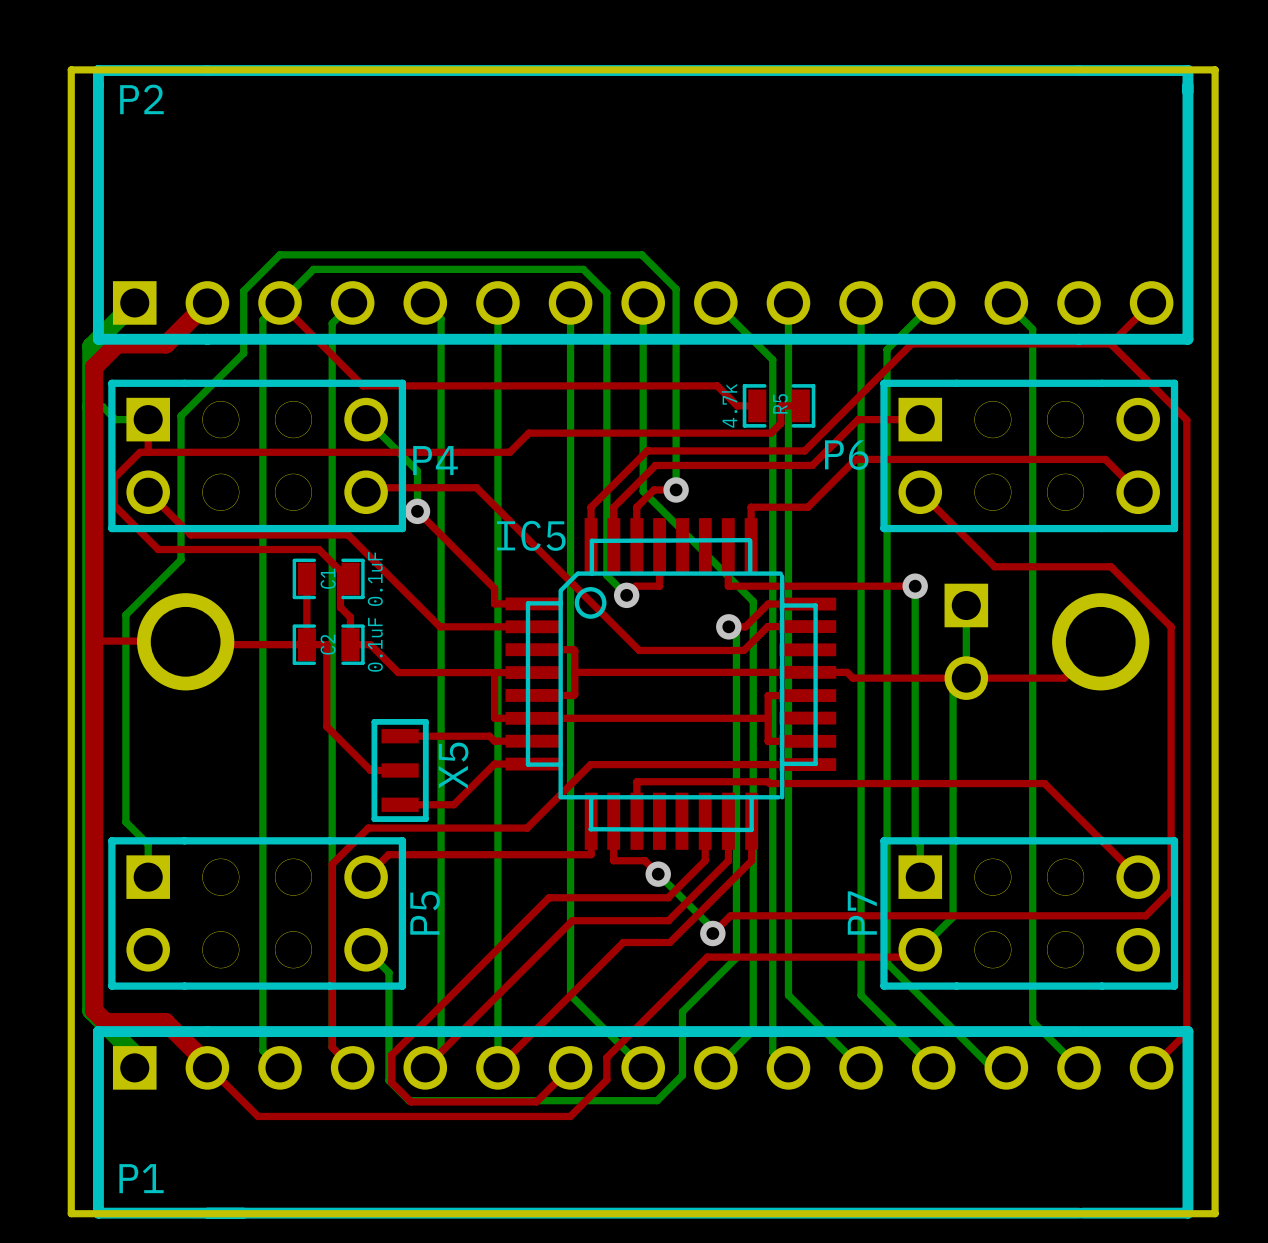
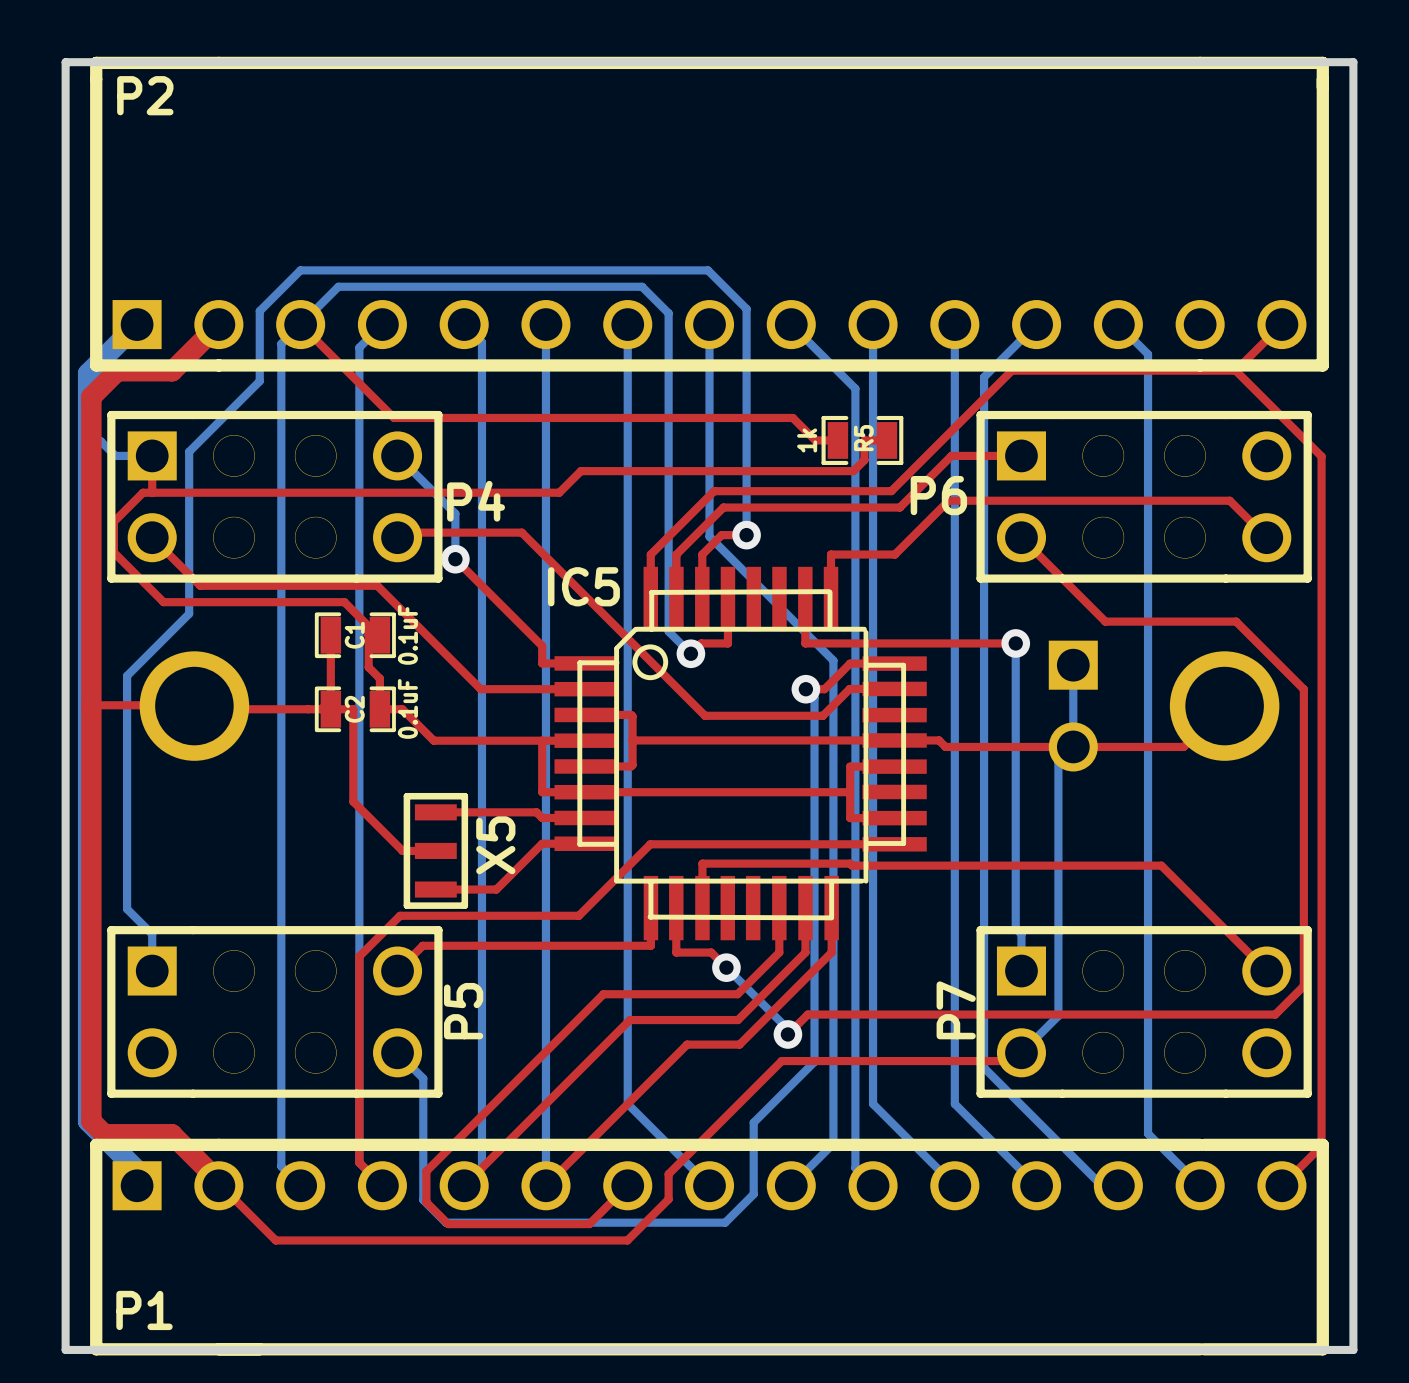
R5 value: 4.7k (729, 405) -> 1k (807, 440)

